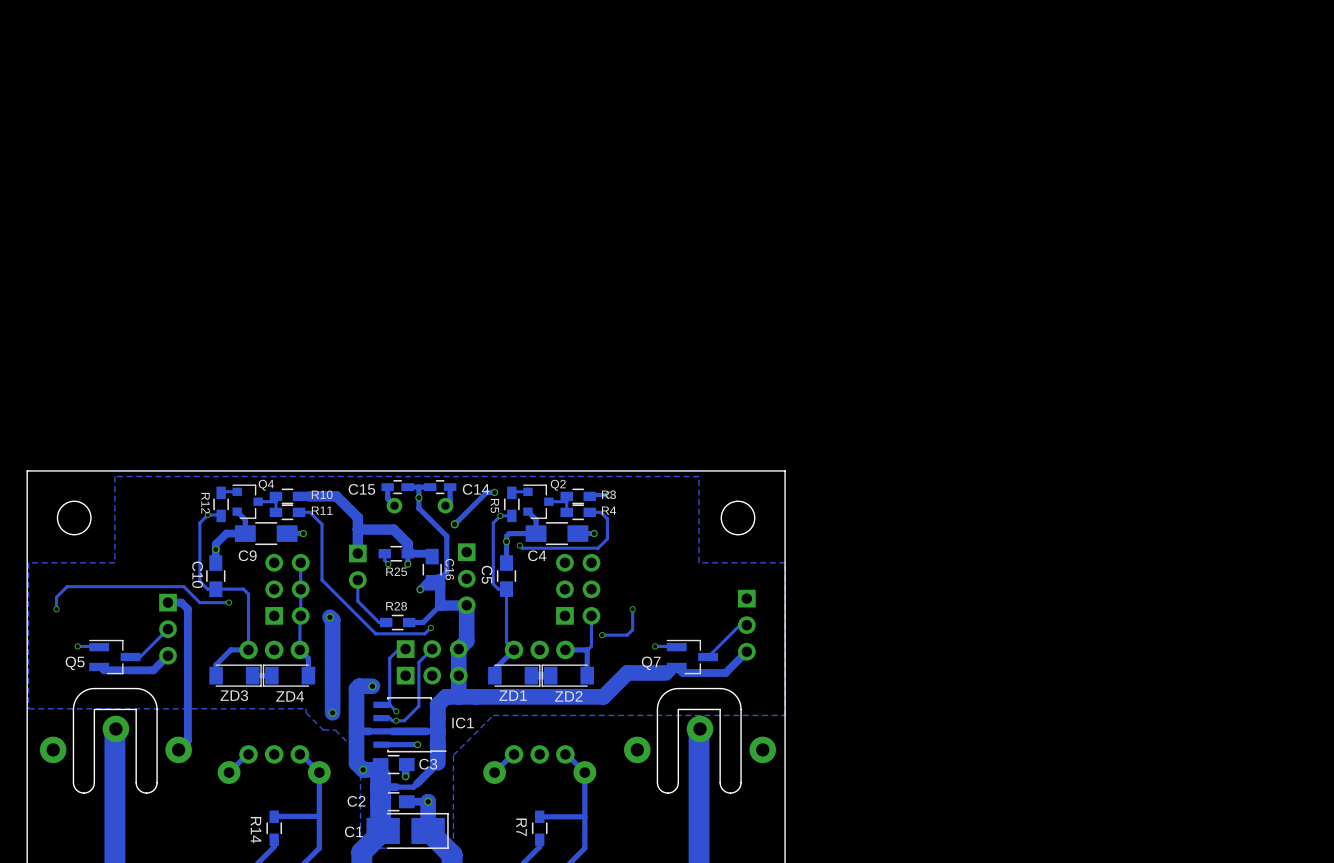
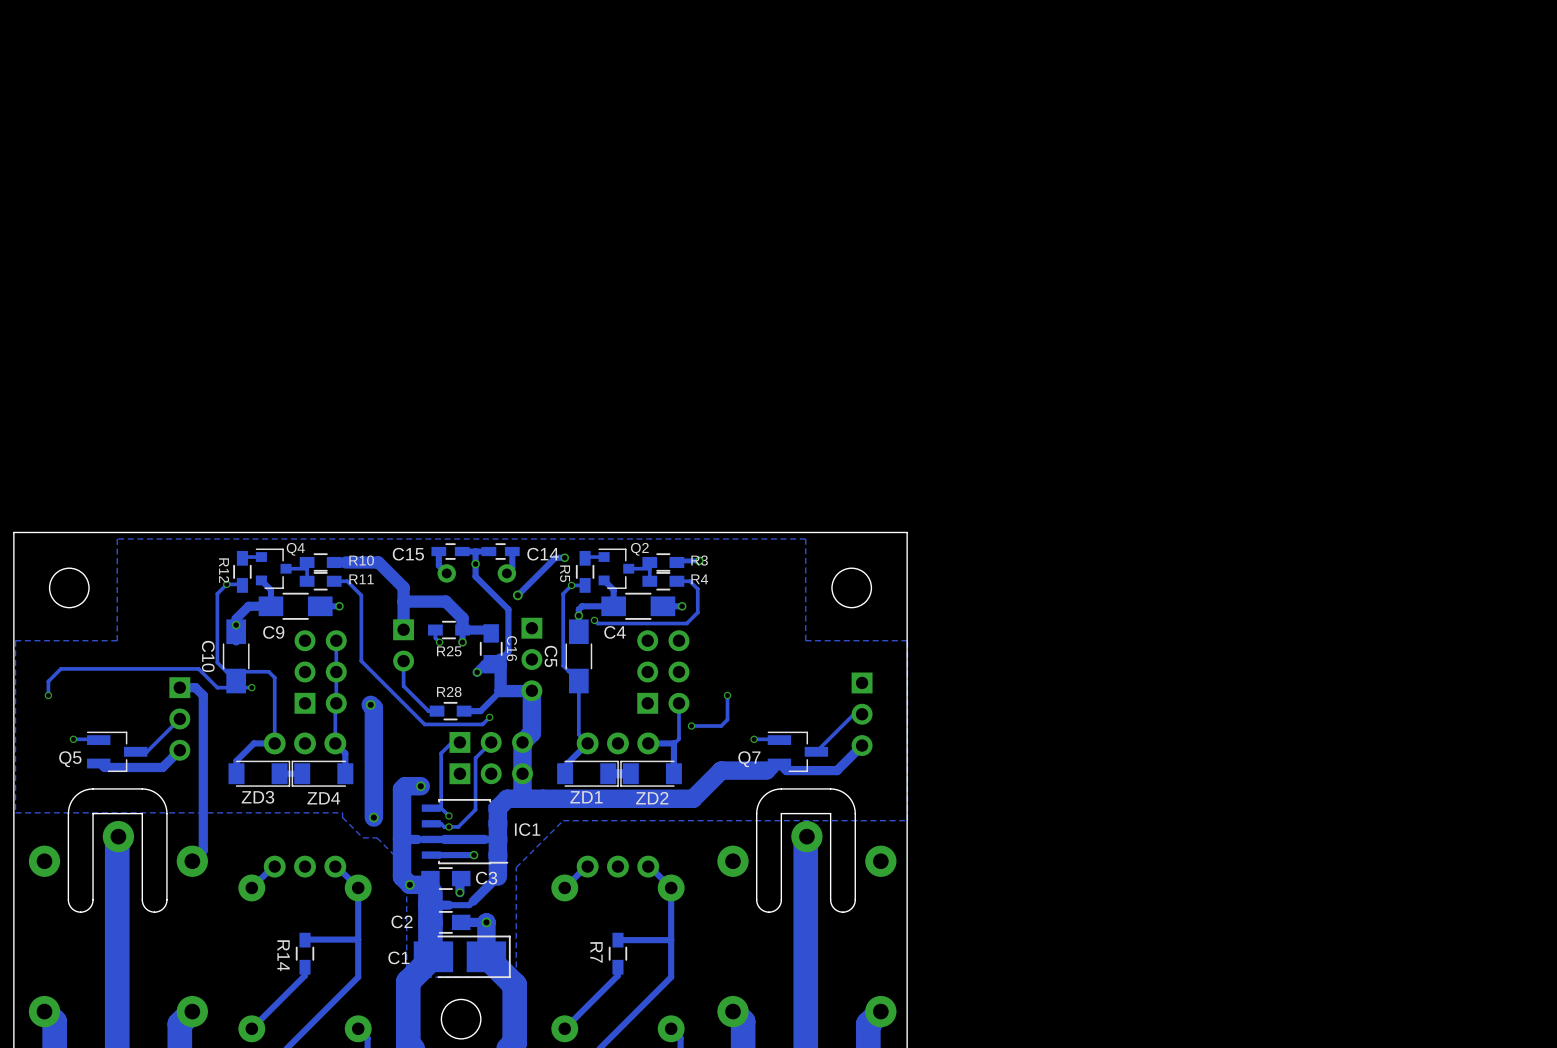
C10 footprint: [206, 555, 226, 597] -> [222, 619, 250, 694]
C5 footprint: [496, 555, 517, 597] -> [565, 619, 593, 694]

